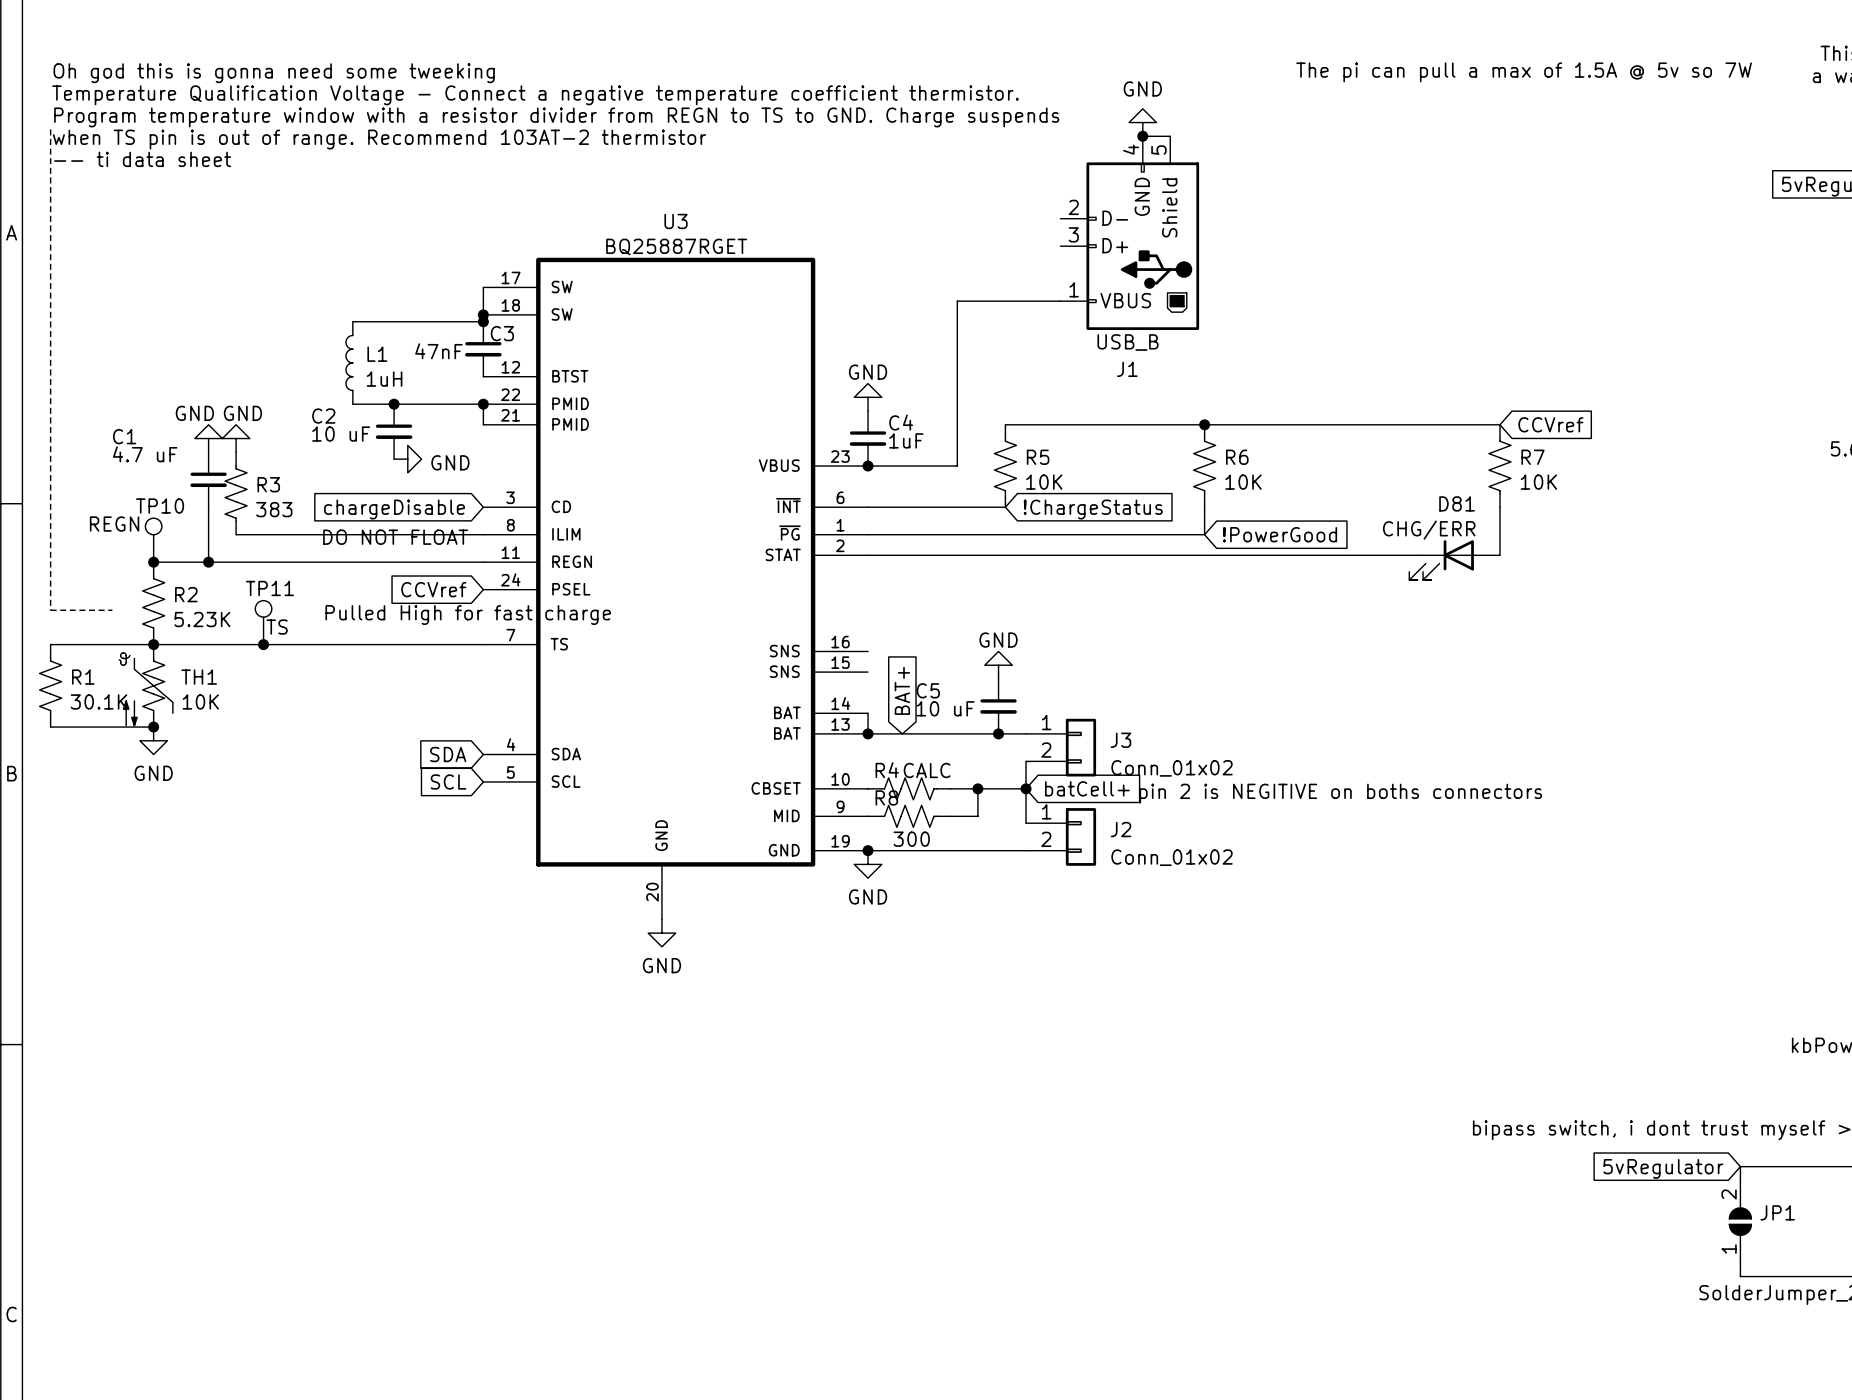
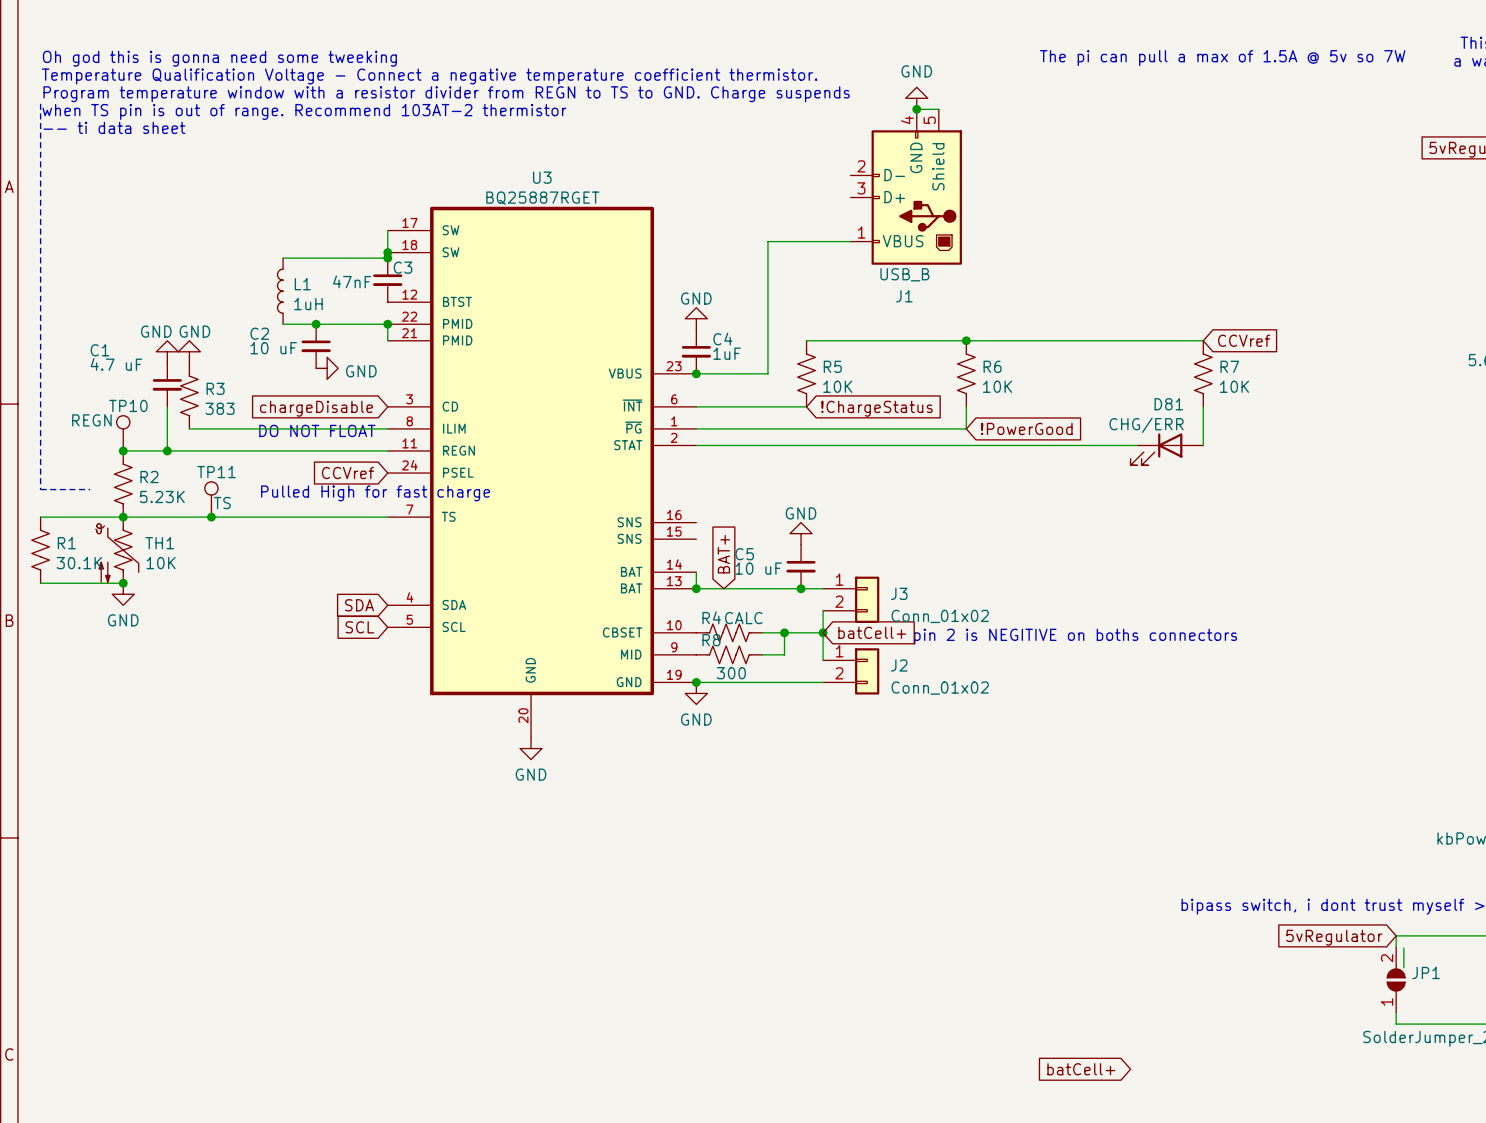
wire: none -> (1403, 948) (1403, 967)
global label: none -> batCell+ (1081, 1069)

